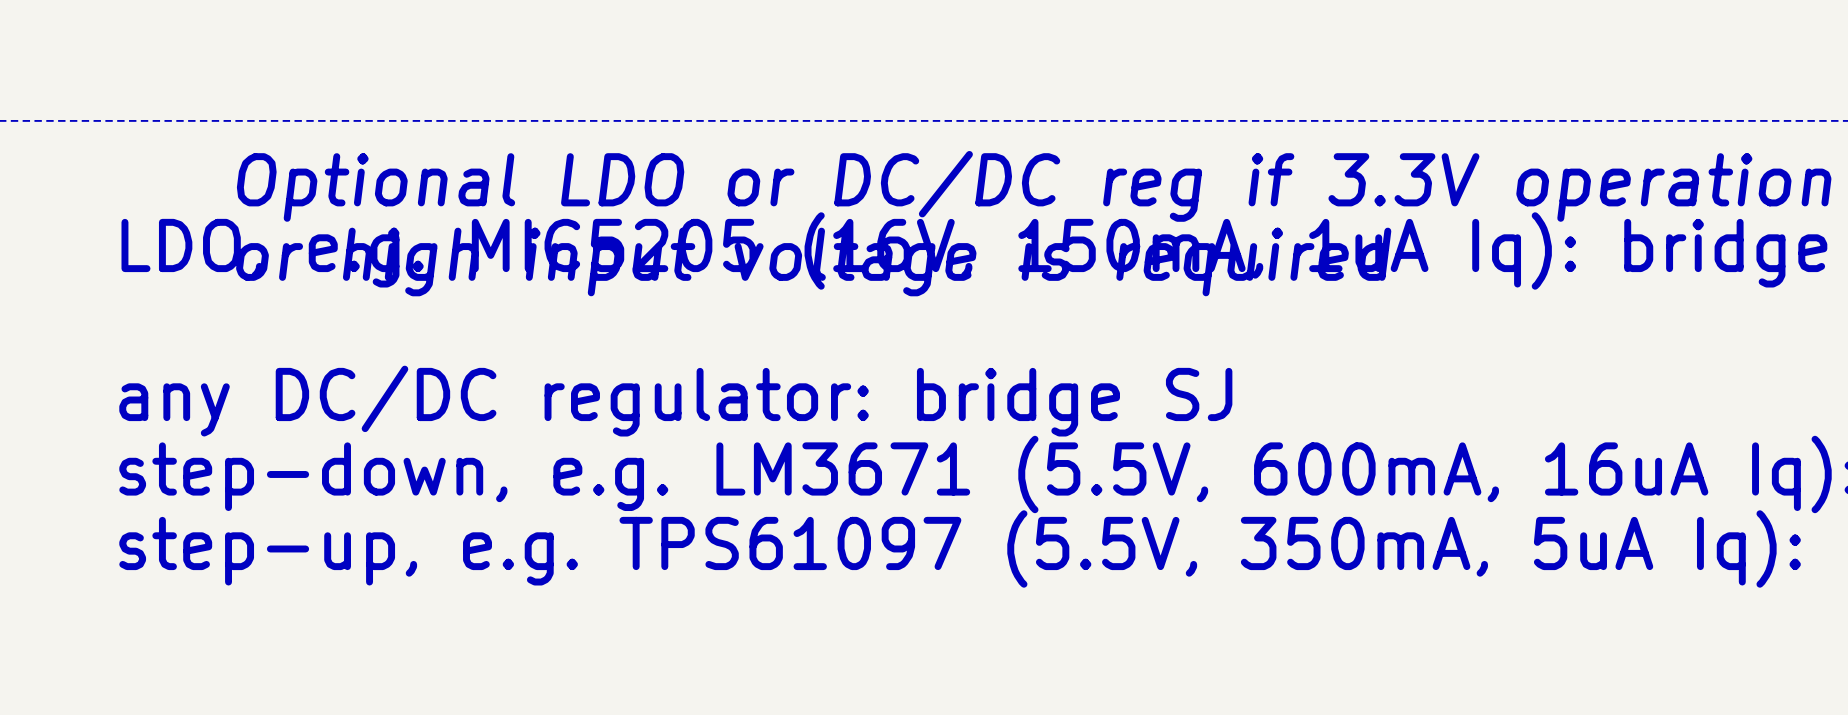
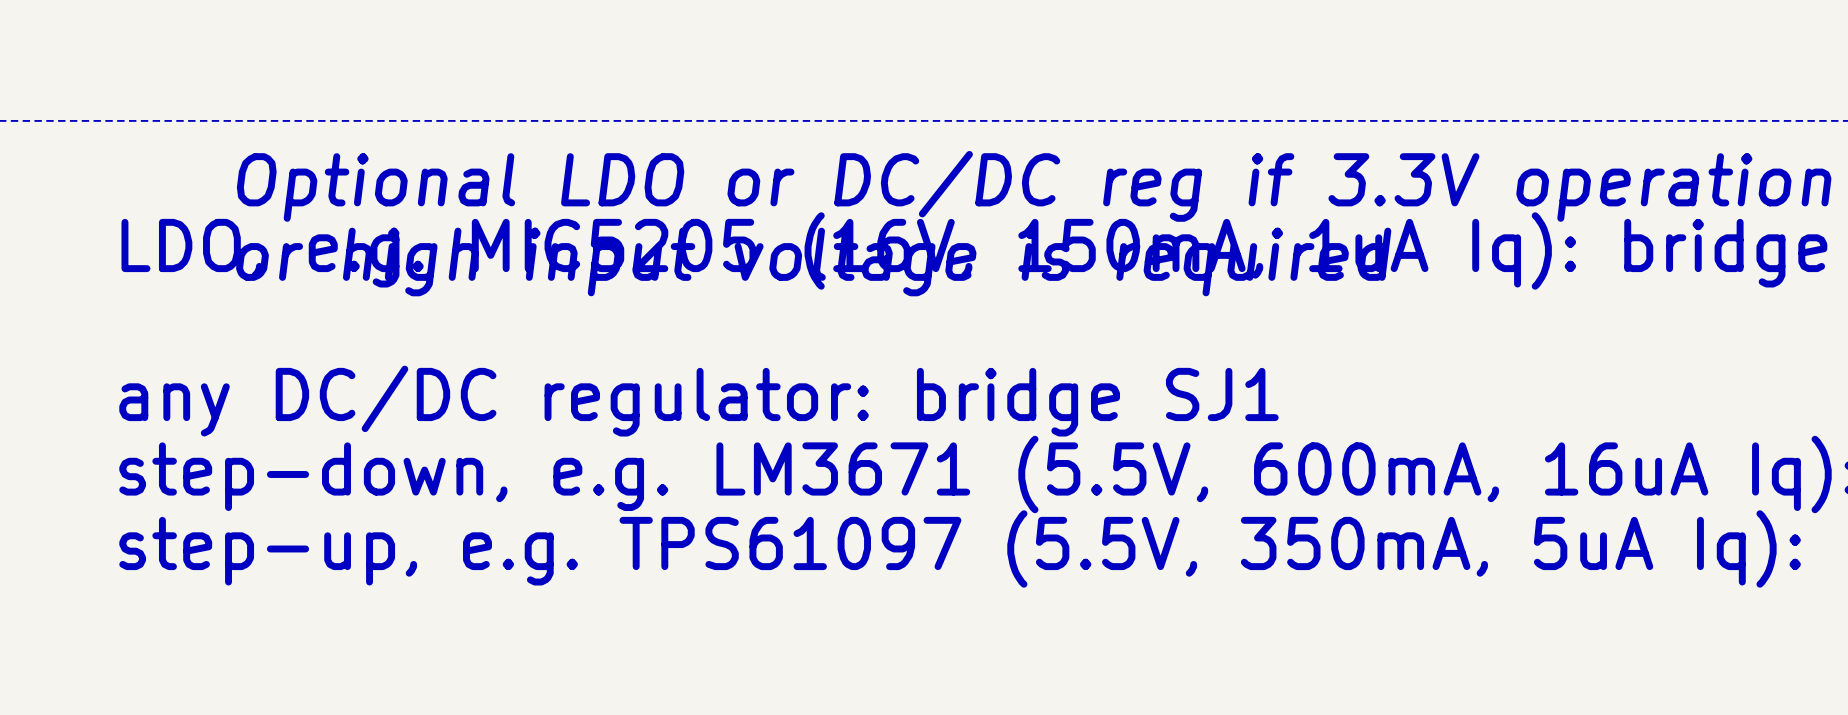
text: any DC/DC regulator: bridge SJ (675, 401) -> any DC/DC regulator: bridge SJ1 (698, 401)

